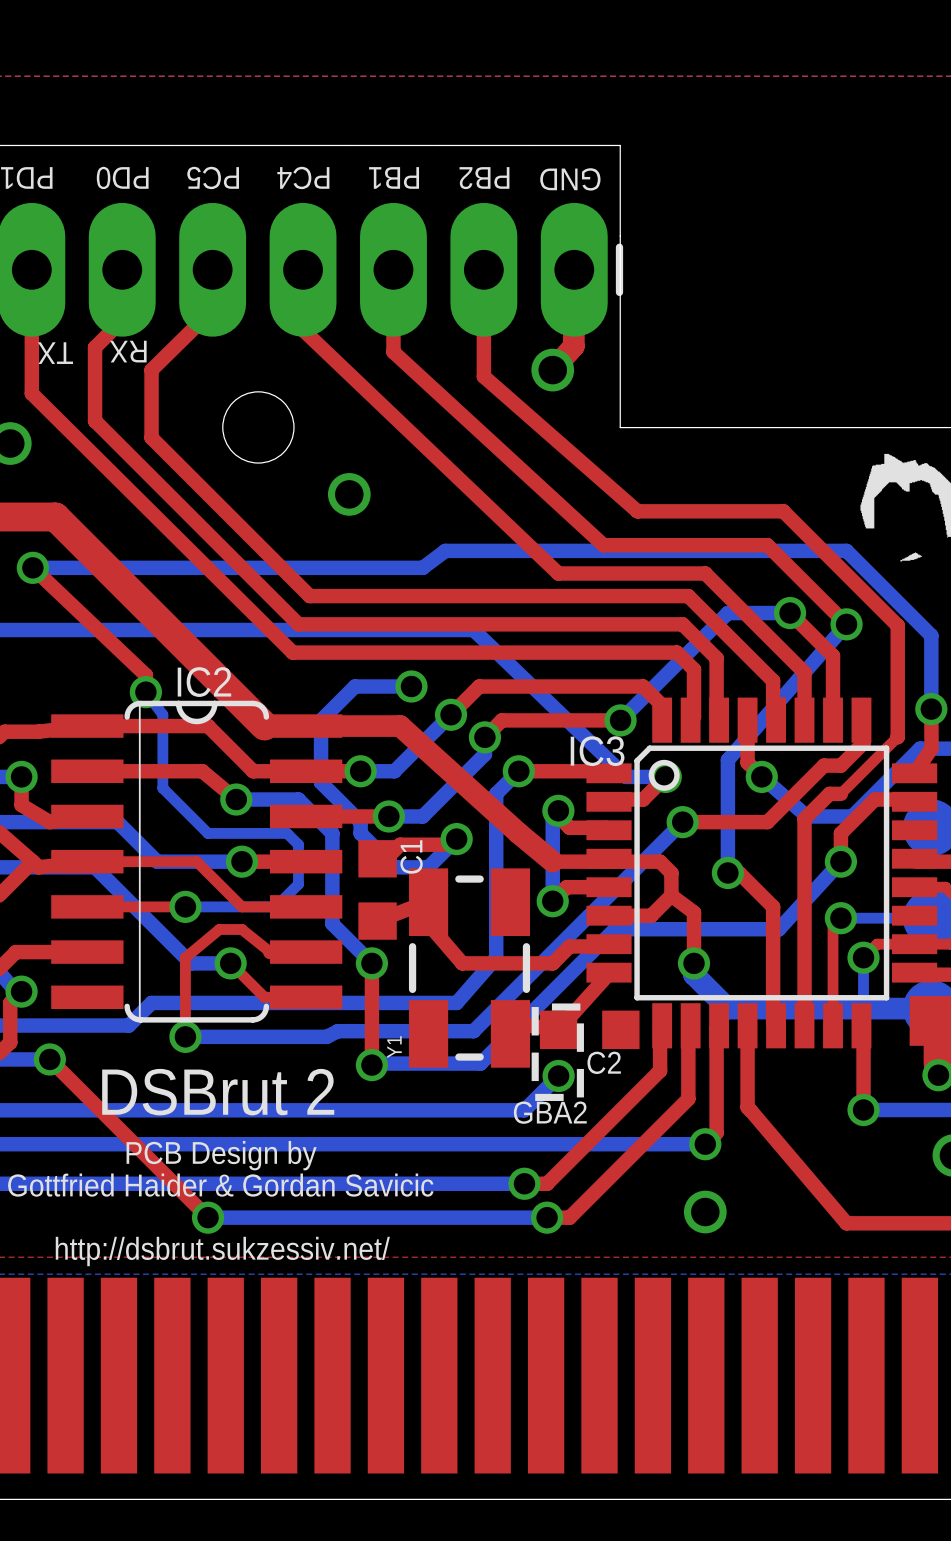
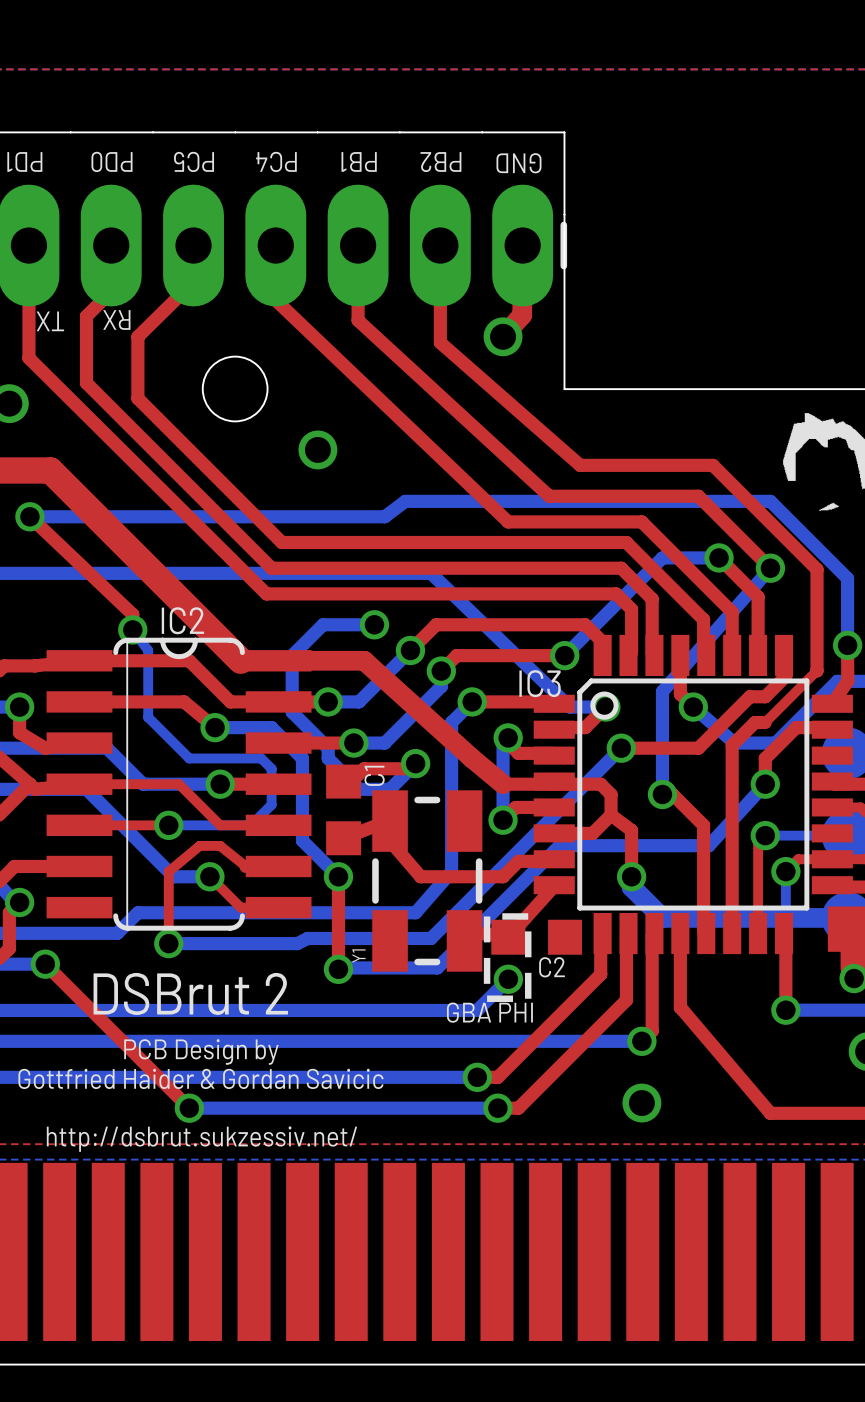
text: GBA2 (550, 1112) -> GBA PHI (489, 1012)

